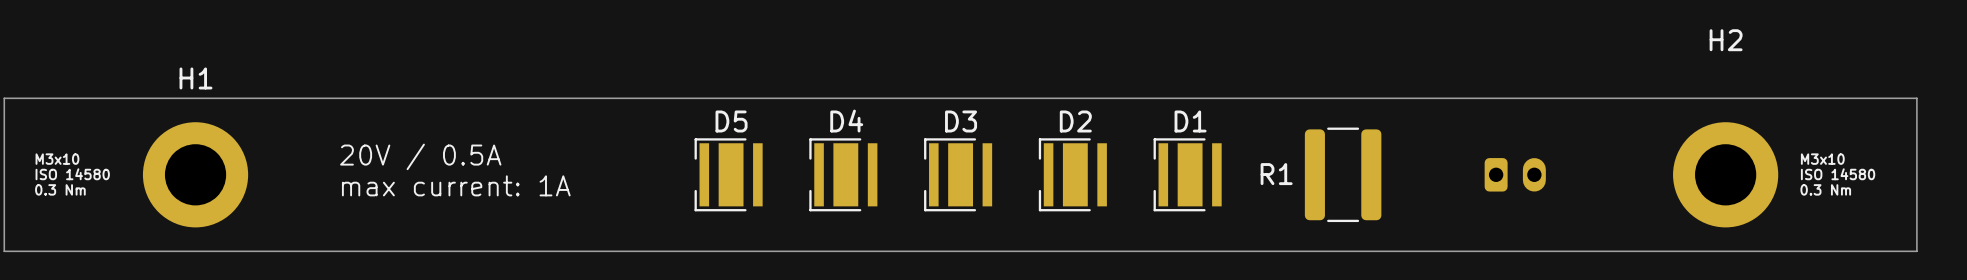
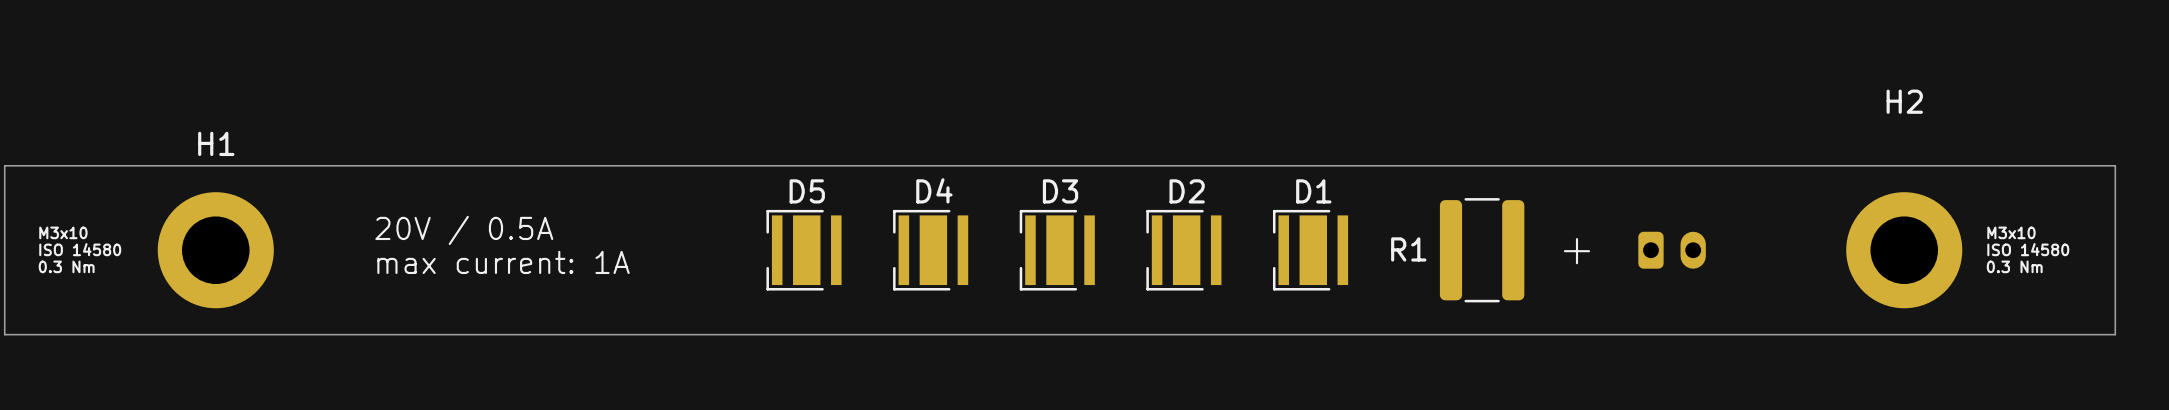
text: none -> + (1576, 251)

